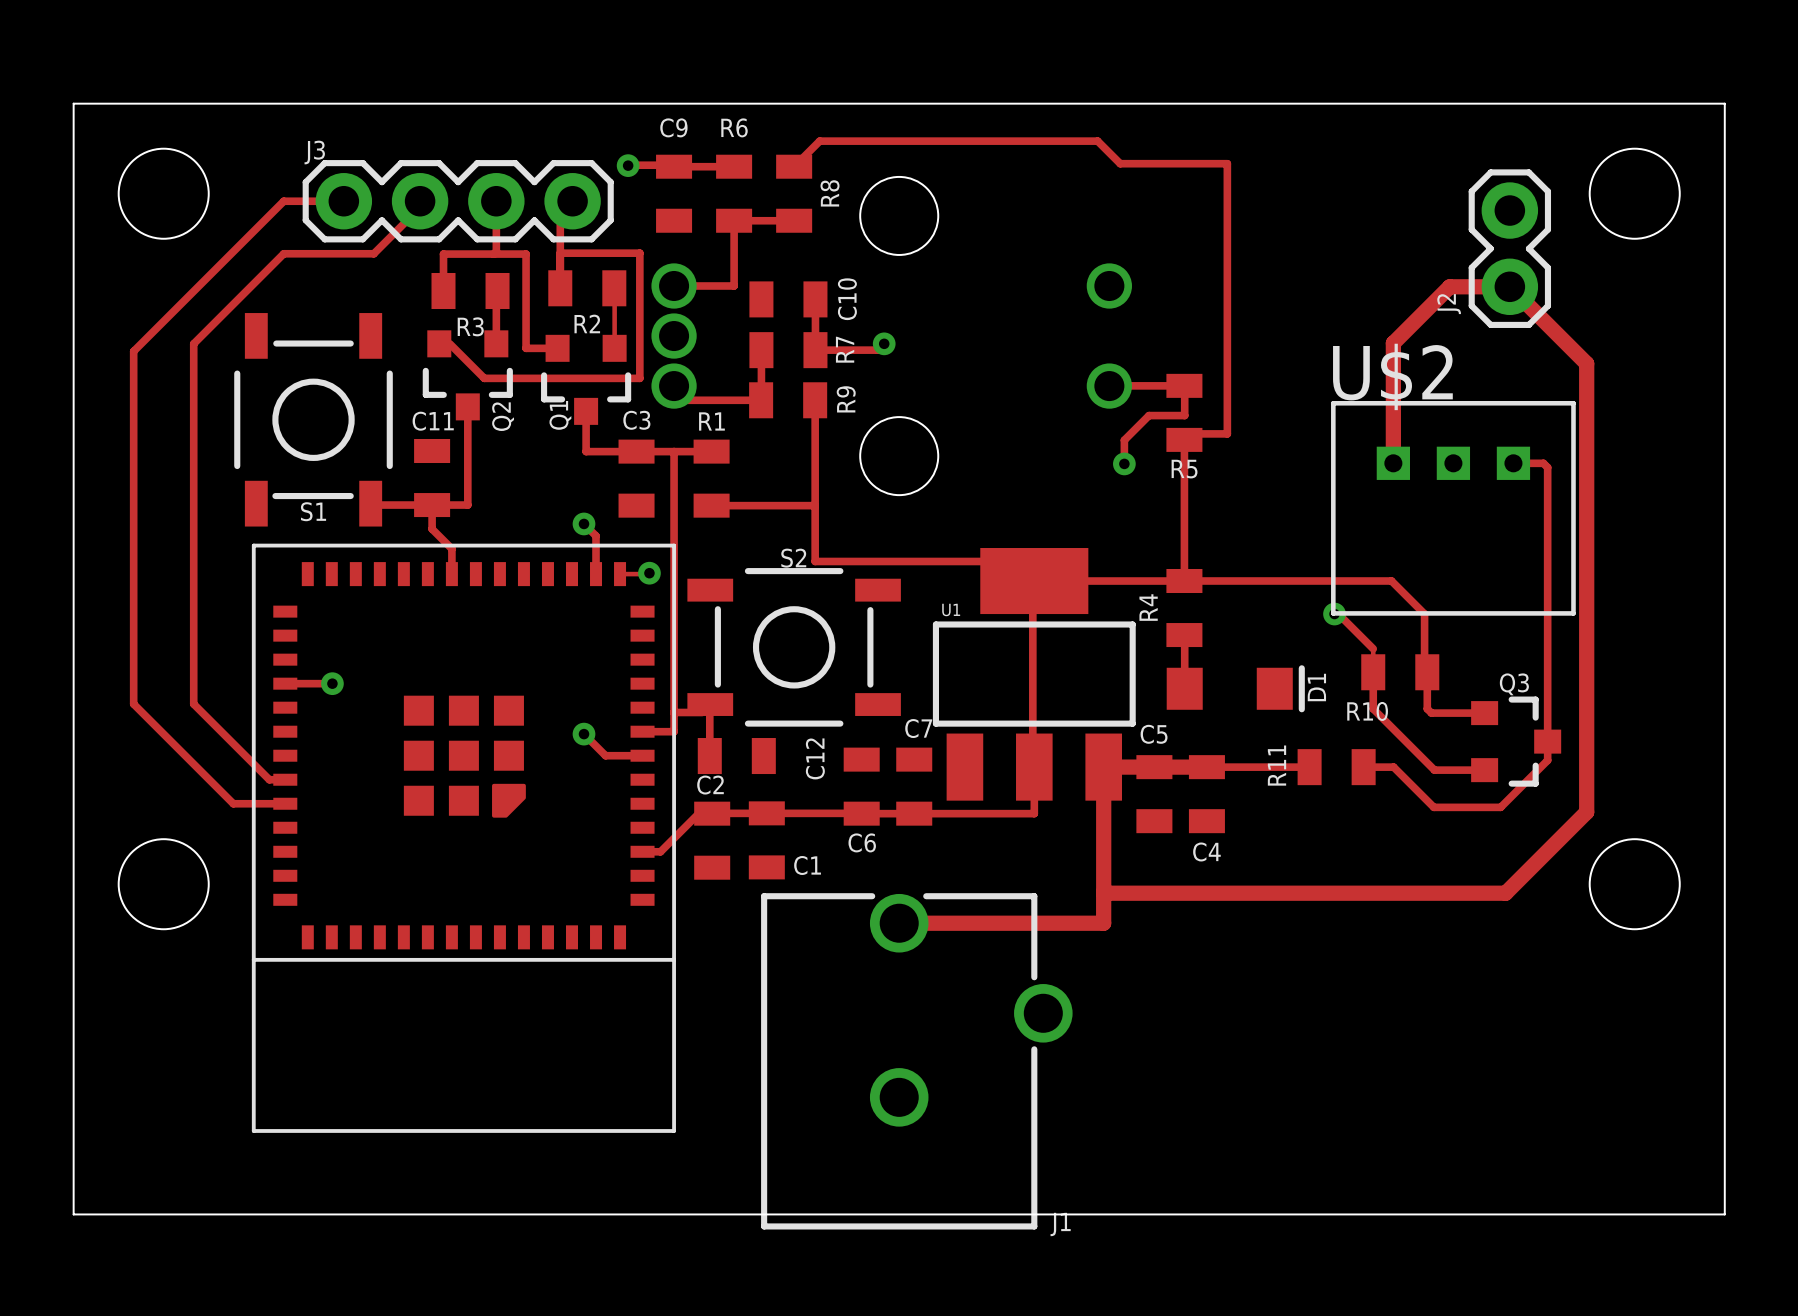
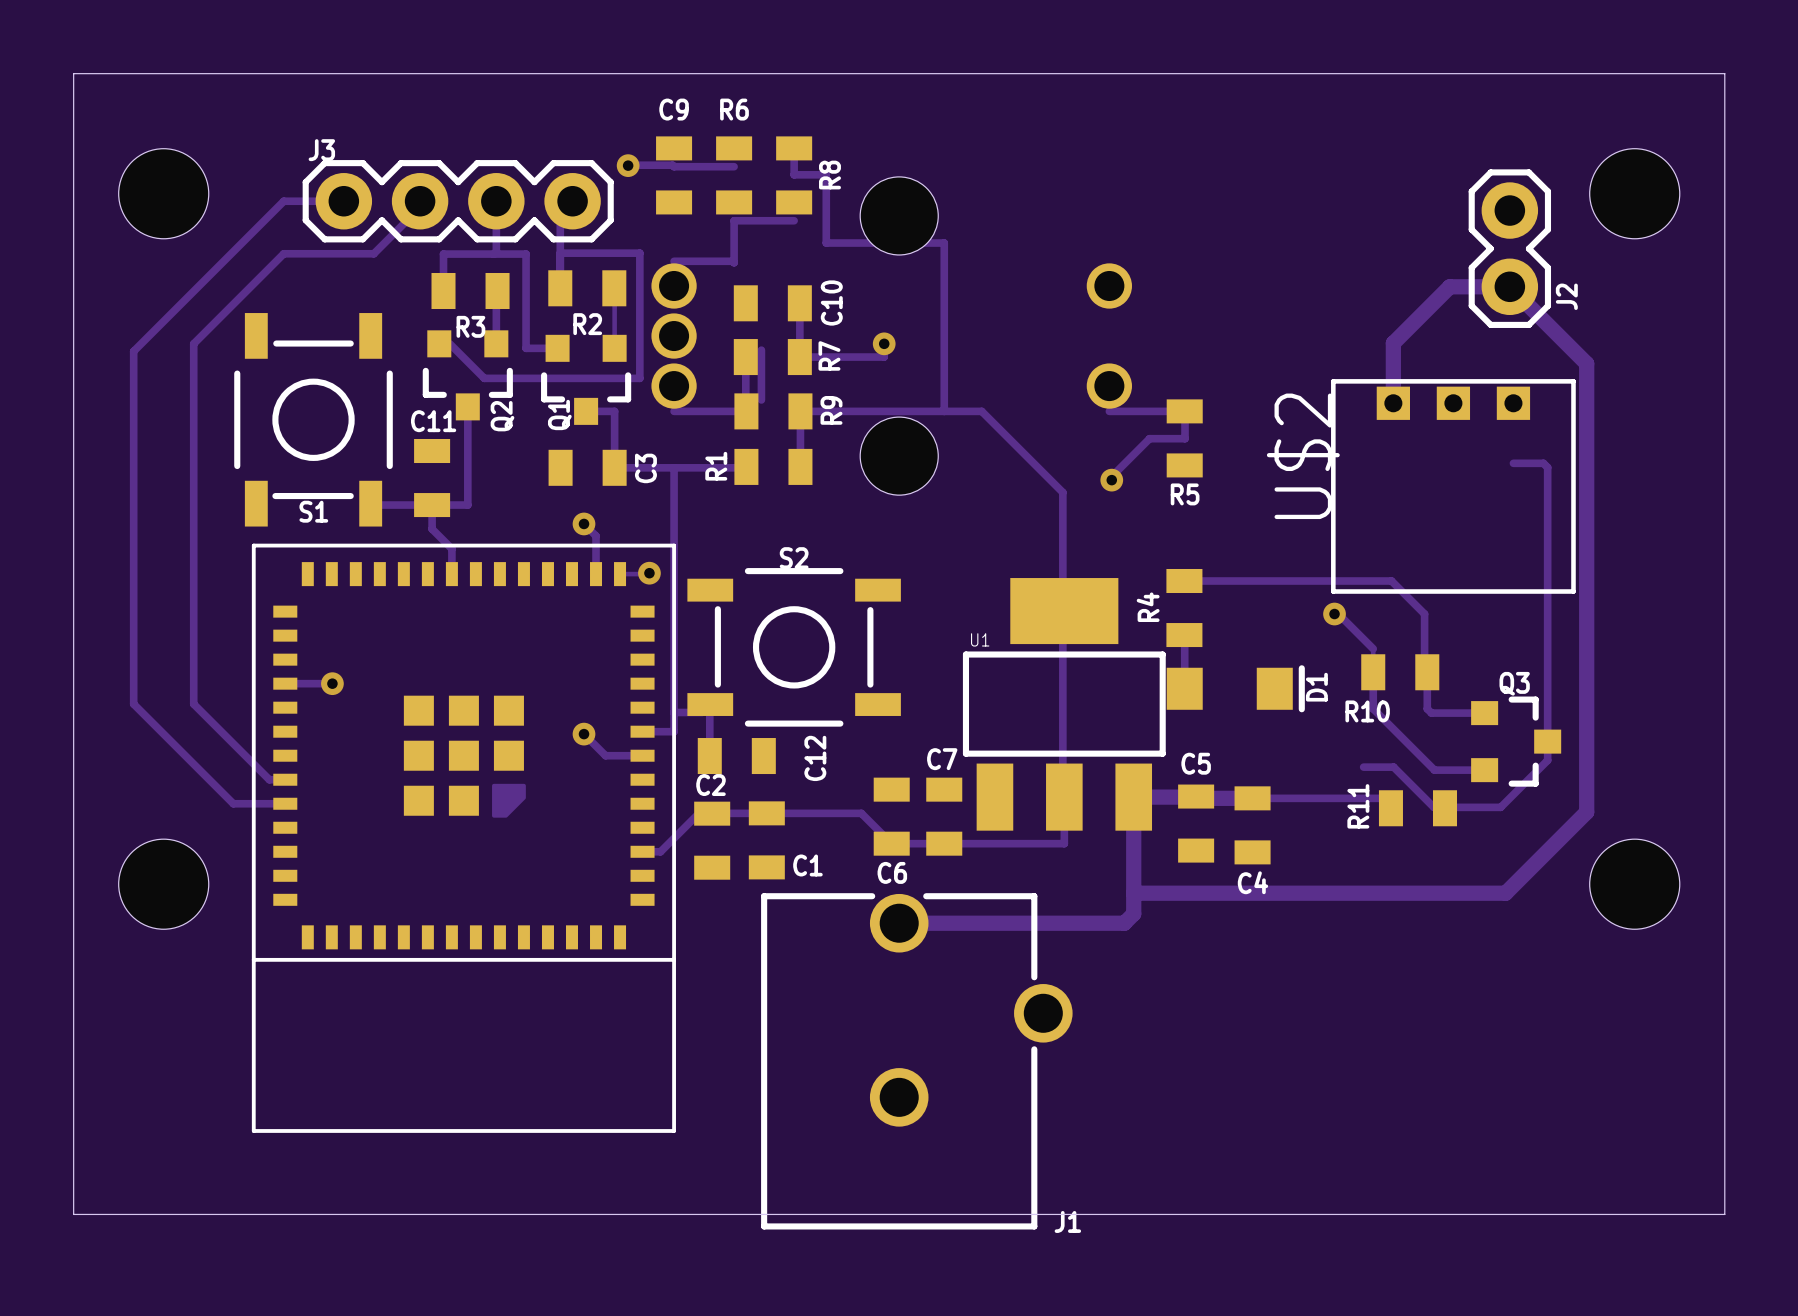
board edge: (73, 103) (1724, 103) -> (73, 103) (73, 73) (1724, 73) (1724, 103)
track: none -> (794, 148) (794, 174) (826, 174) (826, 243) (944, 243) (944, 411)
track: (794, 166) (819, 141) (1097, 141) (1120, 163) (1227, 163) (1227, 433) (1190, 433) (1184, 439) (1184, 581) (1034, 581) -> none
C9 position: (674, 193) -> (674, 175)
R6 position: (734, 193) -> (734, 175)
R8 position: (794, 193) -> (794, 175)
track: (734, 262) (734, 285) (674, 285) -> (734, 262) (674, 261)
C10 position: (788, 299) -> (772, 303)
track: (815, 299) (815, 350) (877, 350) (884, 343) -> (799, 303) (799, 357) (884, 357) (884, 343)
J2 name position: J2 (1449, 304) -> J2 (1566, 296)
R7 position: (788, 350) -> (772, 357)
track: none -> (745, 357) (746, 411) (674, 411)
U$2 name position: U$2 (1392, 376) -> U$2 (1303, 456)
track: (1109, 385) (1184, 385) -> (1109, 411) (1184, 411)
track: (674, 386) (688, 400) (761, 400) -> none
track: (1184, 386) (1184, 415) (1148, 415) (1124, 440) (1124, 463) -> none
R9 position: (788, 400) -> (773, 411)
track: (815, 400) (815, 561) (1014, 561) (1034, 581) -> none
U$2 footprint: [1331, 400, 1576, 616] -> [1331, 379, 1576, 594]
track: (1393, 403) (1393, 463) -> none
track: (586, 411) (586, 451) (711, 451) -> (586, 411) (614, 411) (614, 467) (746, 466)
track: none -> (1185, 411) (1185, 438) (1149, 438) (1111, 476) (1111, 480)
R5 position: (1184, 412) -> (1184, 438)
R1 name position: R1 (711, 421) -> R1 (716, 466)
track: (674, 451) (674, 467) -> none
via position: (1124, 463) -> (1111, 480)
C3 rotation: 0° (636, 478) -> 90° clockwise (587, 467)
C3 position: (636, 478) -> (587, 467)
R1 rotation: 0° (711, 478) -> 90° clockwise (773, 466)
R1 position: (711, 478) -> (773, 466)
track: (711, 505) (815, 505) -> none
track: (1034, 581) (1034, 813) (861, 813) -> (800, 466) (800, 411) (981, 411) (1062, 492) (1064, 843) (891, 843) (861, 813)
U1 position: (1034, 674) -> (1064, 704)
C7 name position: C7 (918, 728) -> C7 (942, 759)
track: (1309, 767) (1103, 767) (1104, 893) -> none
R11 position: (1336, 767) -> (1417, 808)
C6 position: (861, 786) -> (891, 816)
C7 position: (914, 786) -> (944, 816)
C5 position: (1154, 794) -> (1196, 823)
C4 position: (1206, 794) -> (1252, 825)
track: (1133, 893) (1103, 893) (1103, 923) -> (1390, 808) (1381, 798) (1133, 797) (1133, 913) (1124, 923) (1103, 923)

